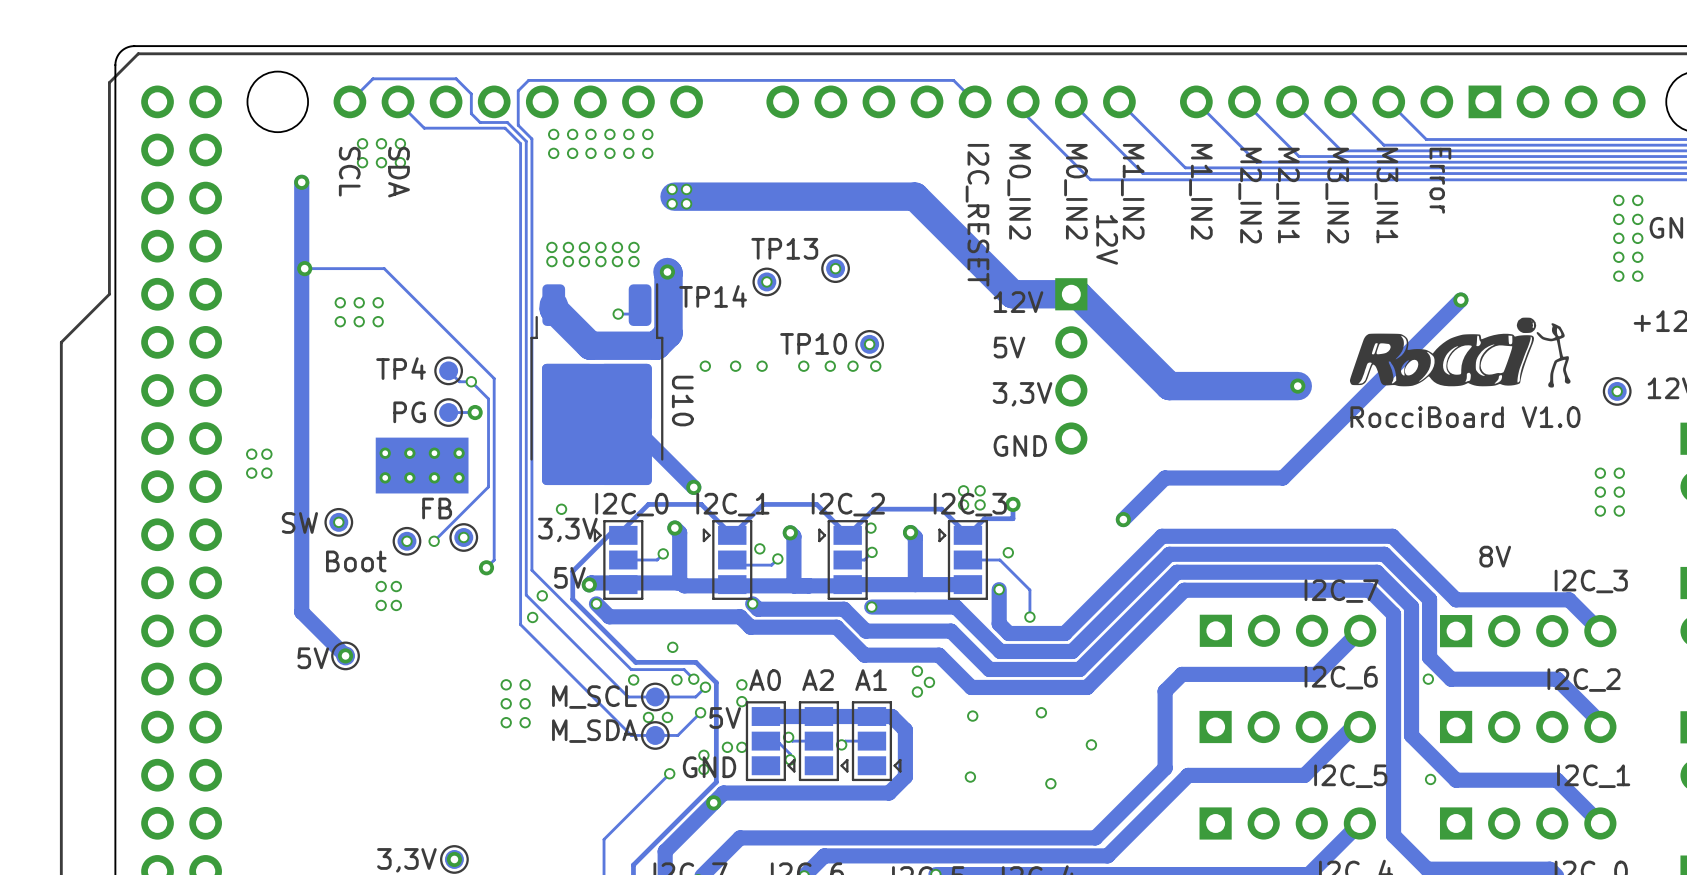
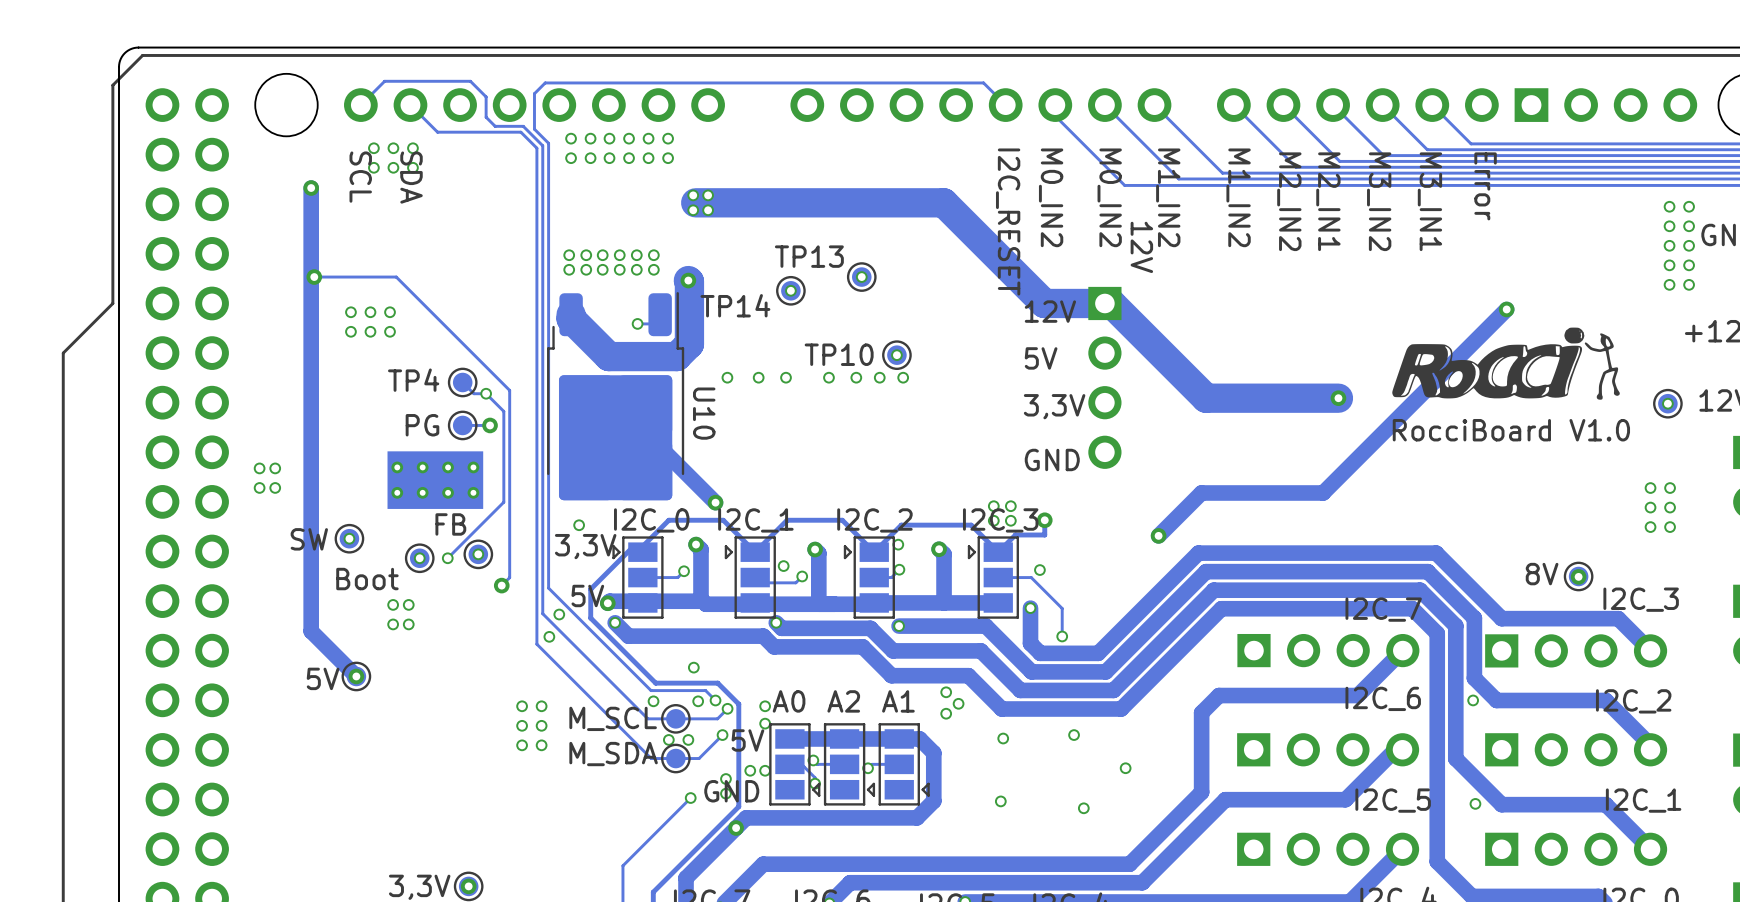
part: none -> (1578, 576)
via: none -> (1578, 576)

